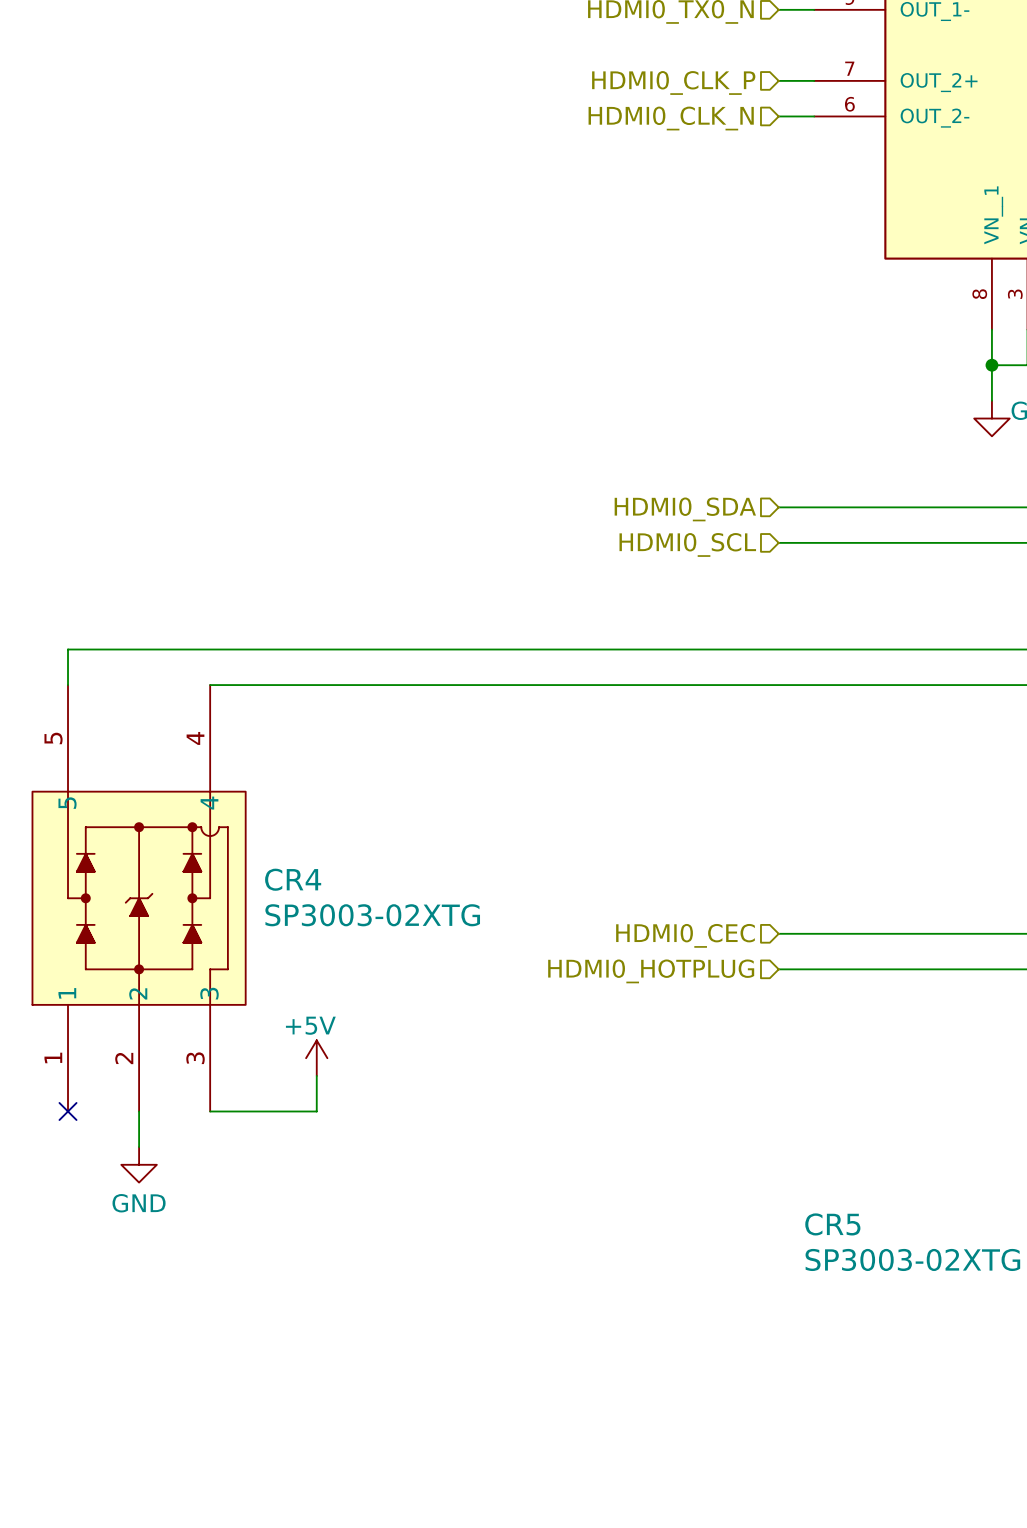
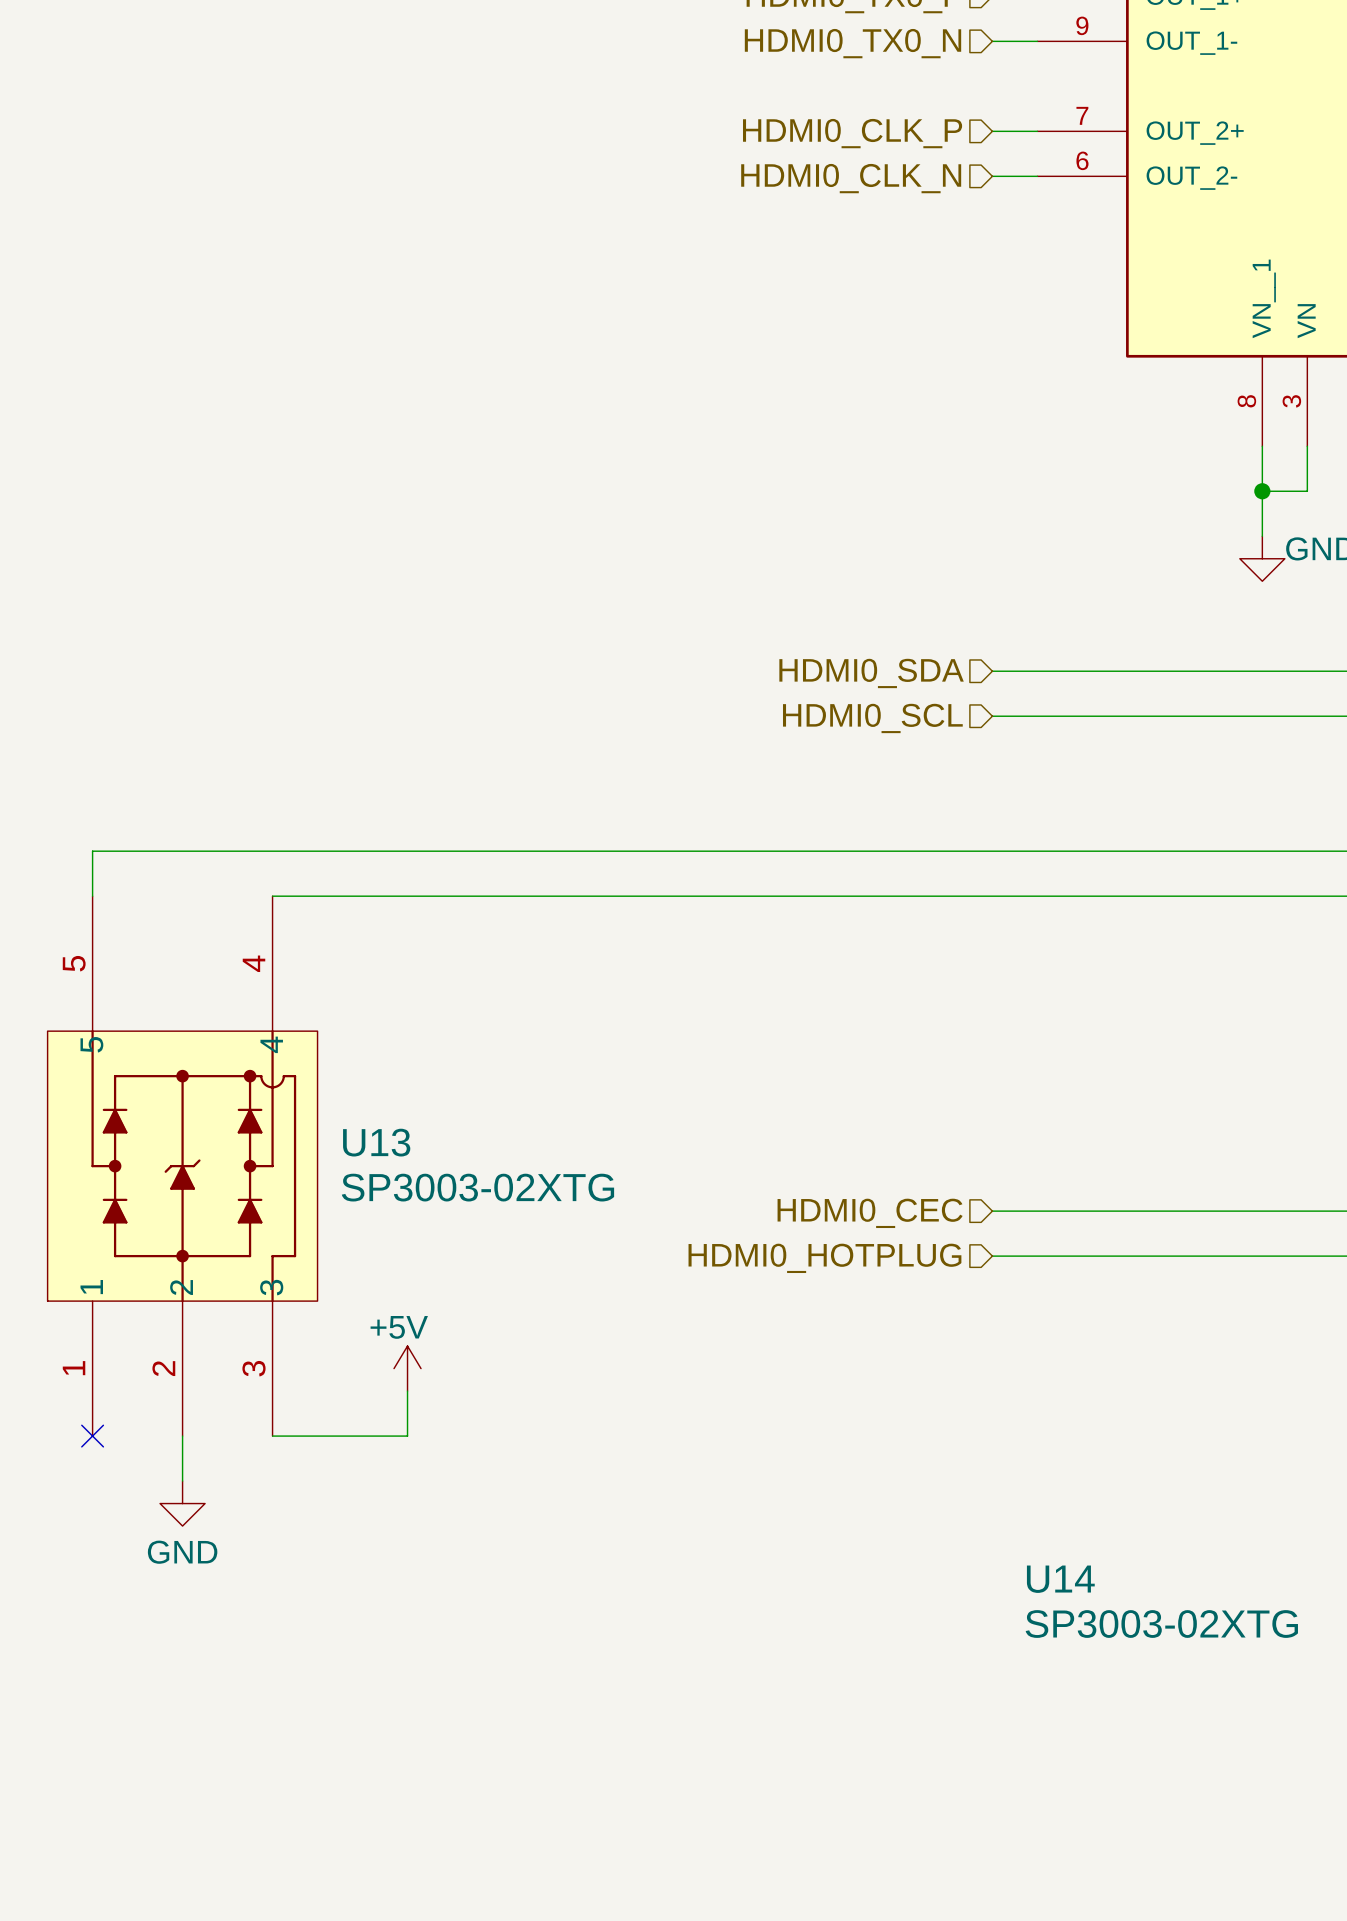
CR4 name: CR4 (293, 879) -> U13 (376, 1142)
CR5 name: CR5 (832, 1224) -> U14 (1060, 1579)

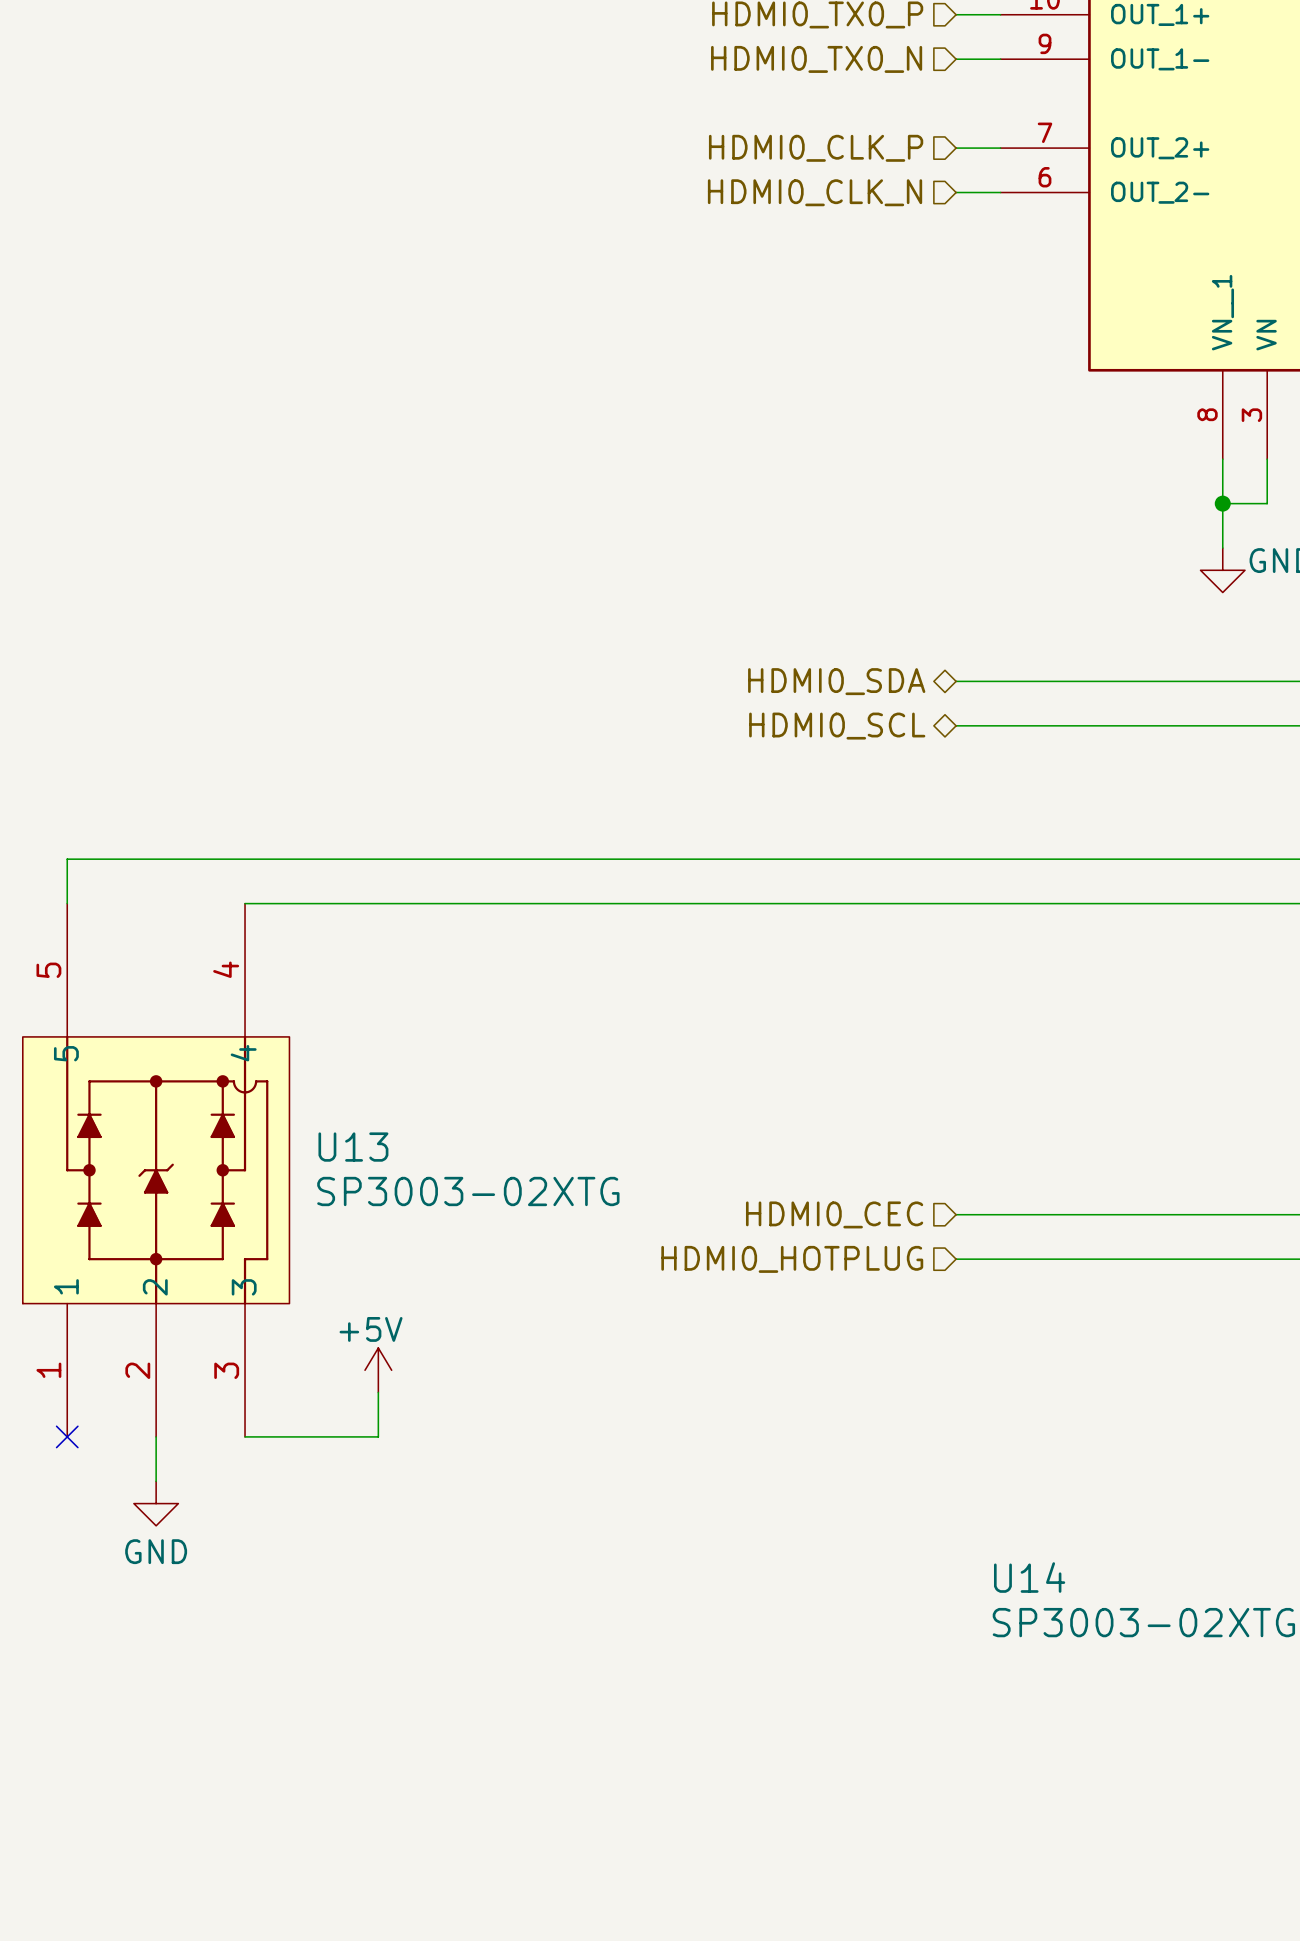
hierarchical label shape: input (871, 673) -> bidirectional (836, 681)
hierarchical label shape: input (872, 718) -> bidirectional (837, 726)

